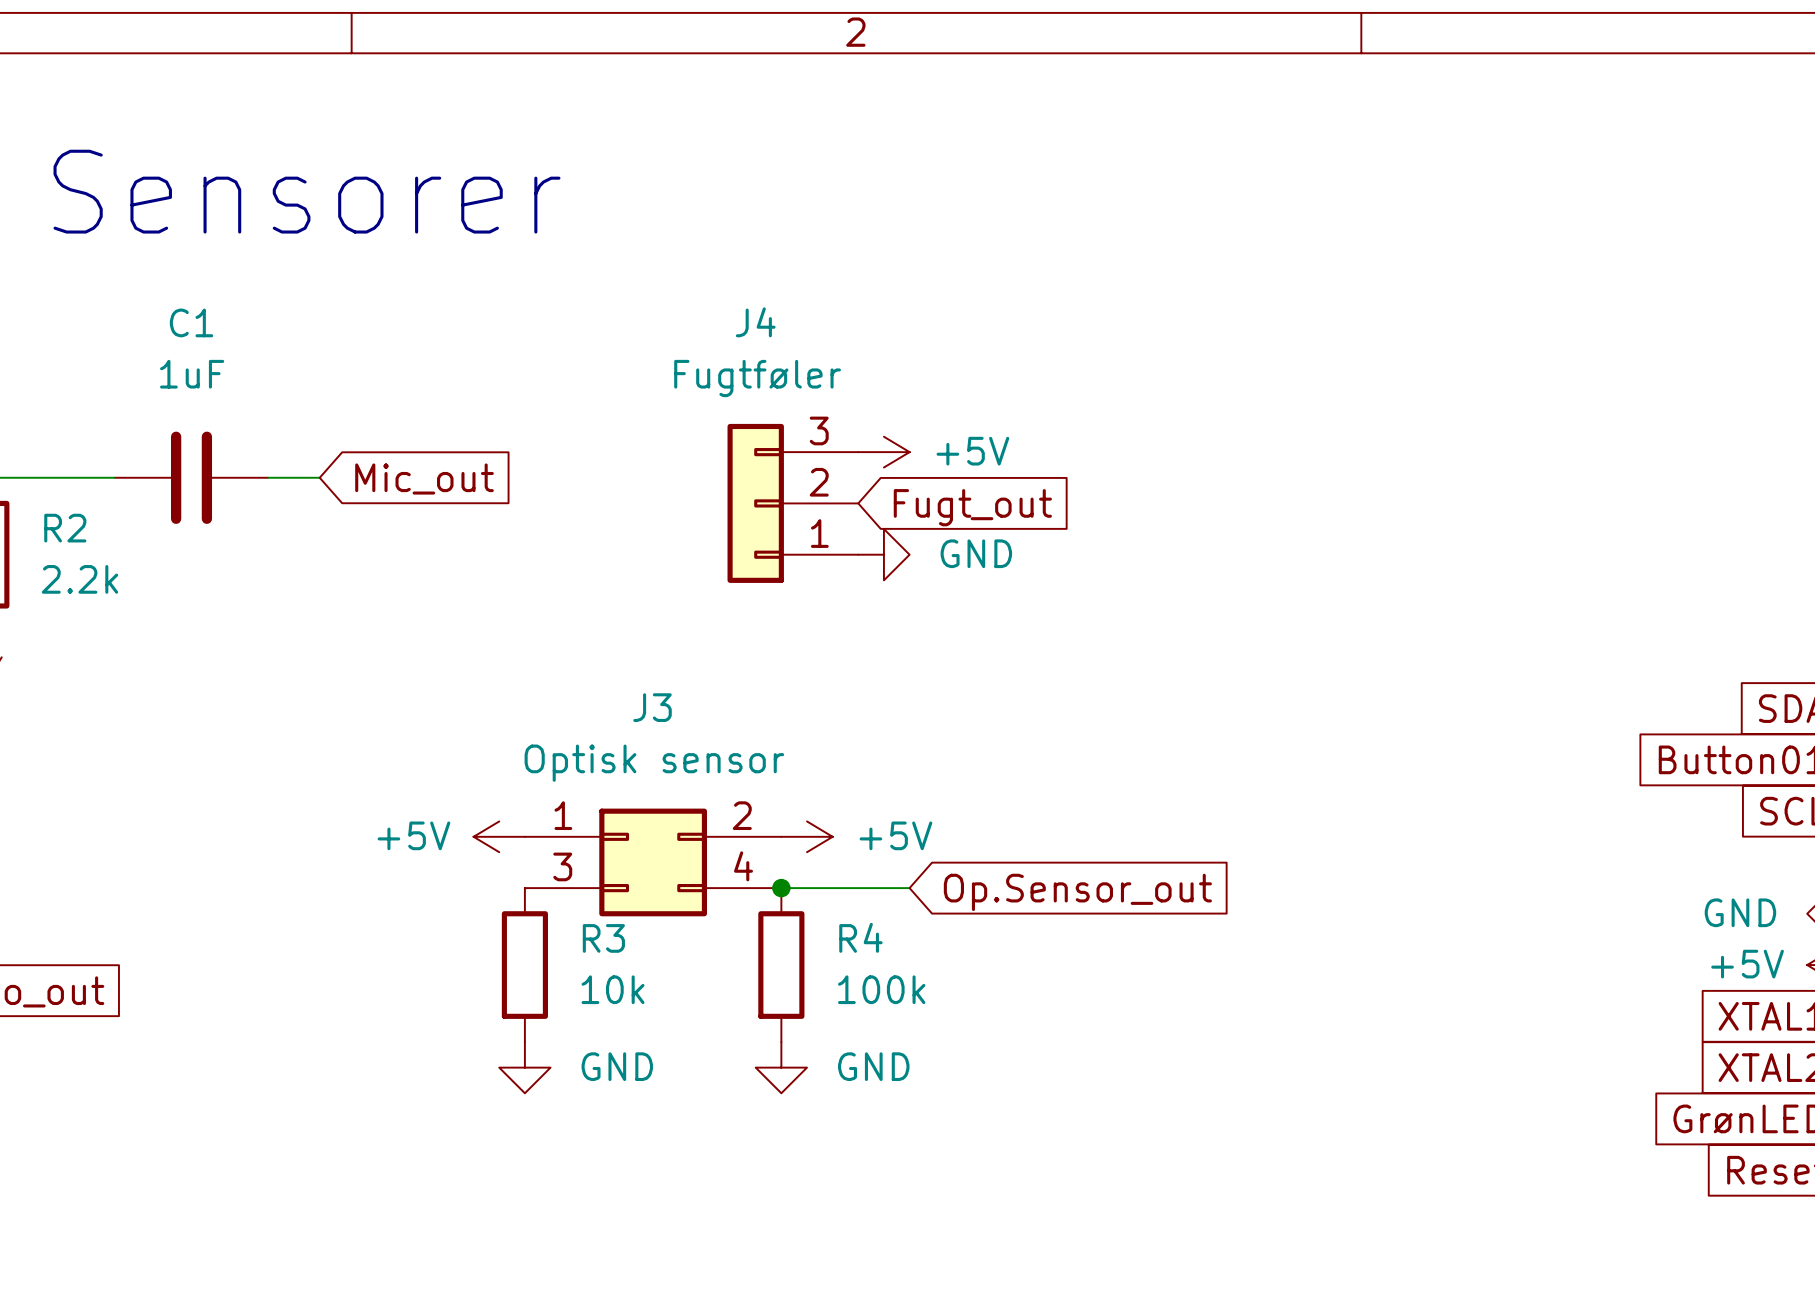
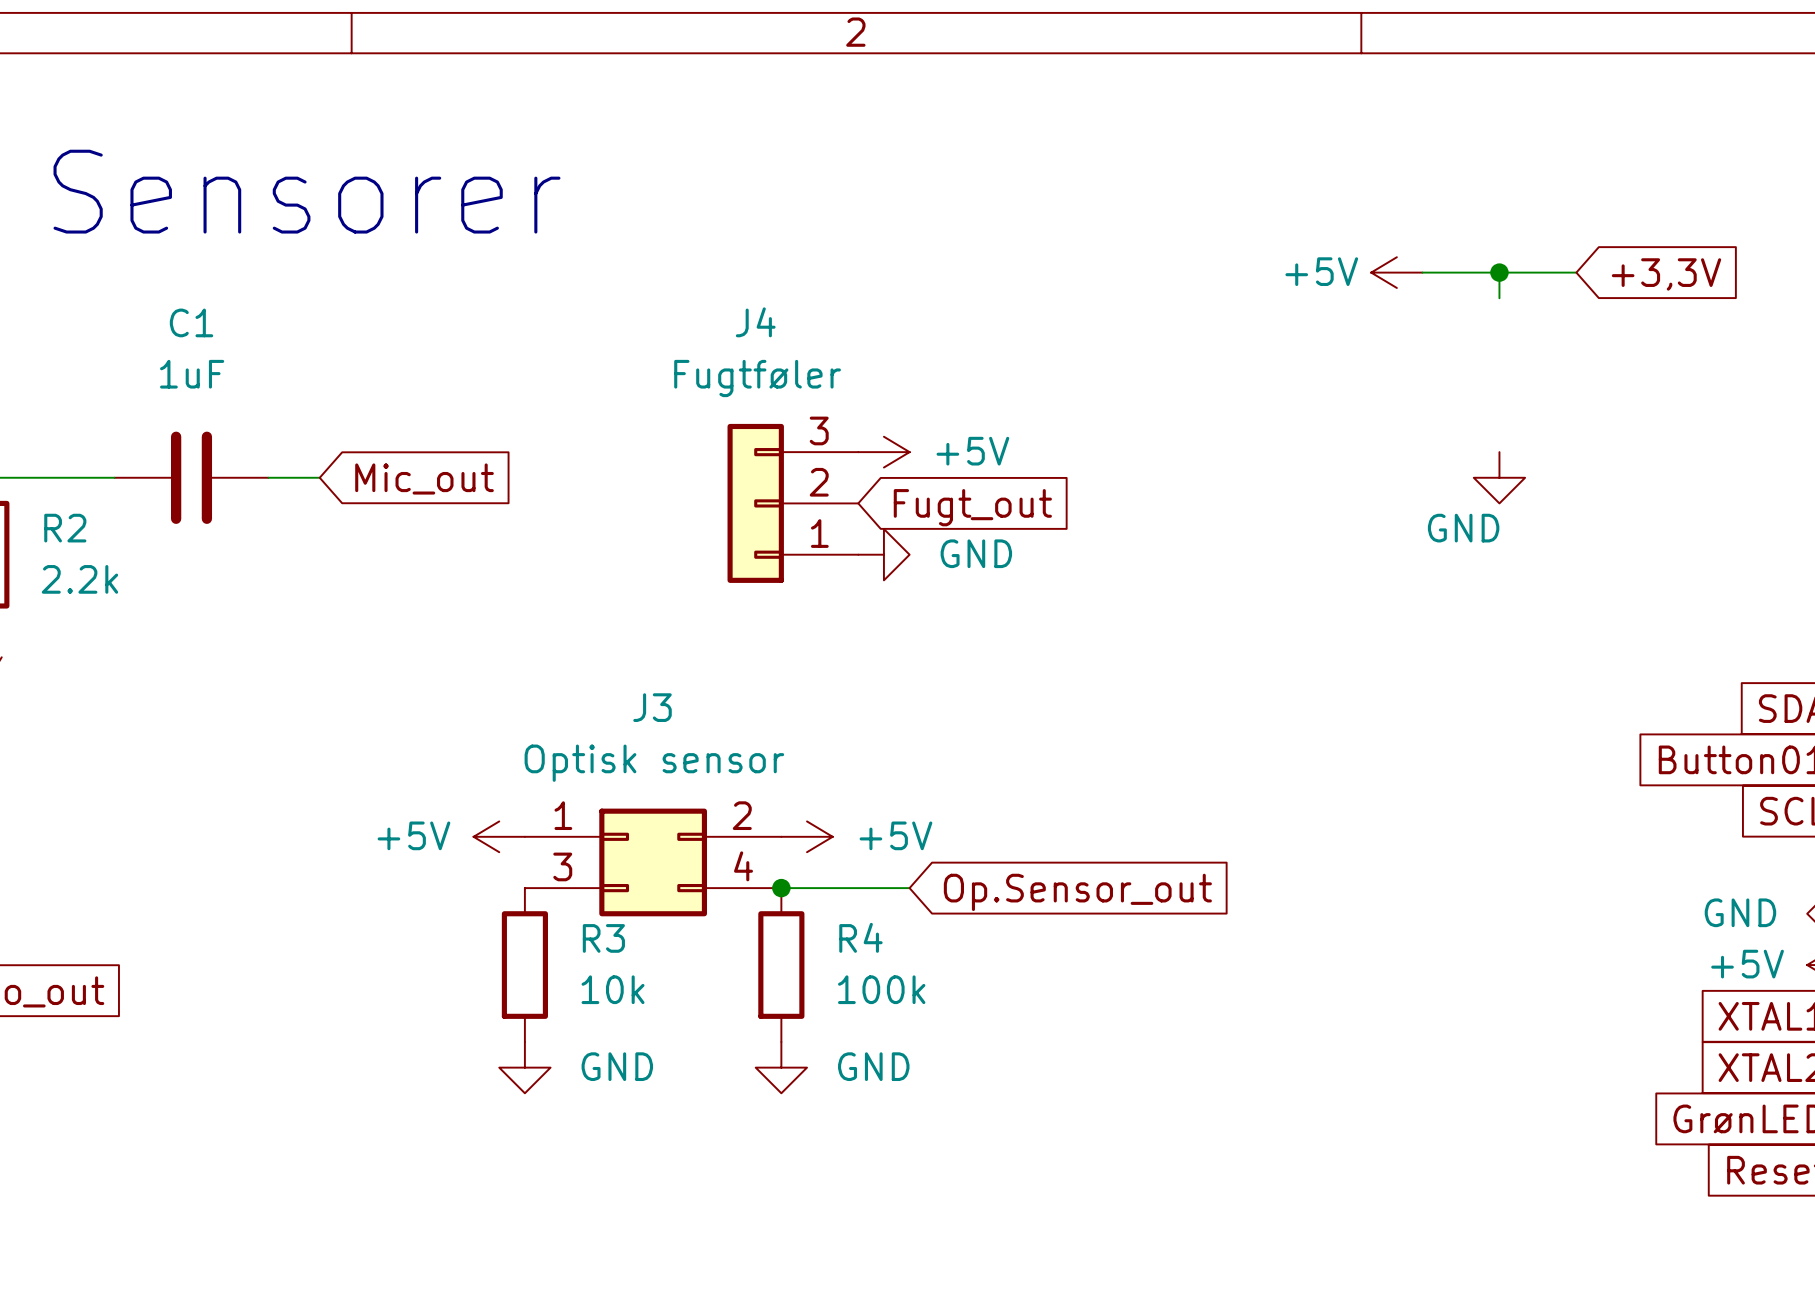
power symbol: none -> +5V (1396, 272)
wire: none -> (1422, 272) (1576, 272)
wire: none -> (1499, 272) (1499, 298)
junction: none -> (1499, 272)
global label: none -> +3,3V (1666, 274)
power symbol: none -> GND (1499, 477)

